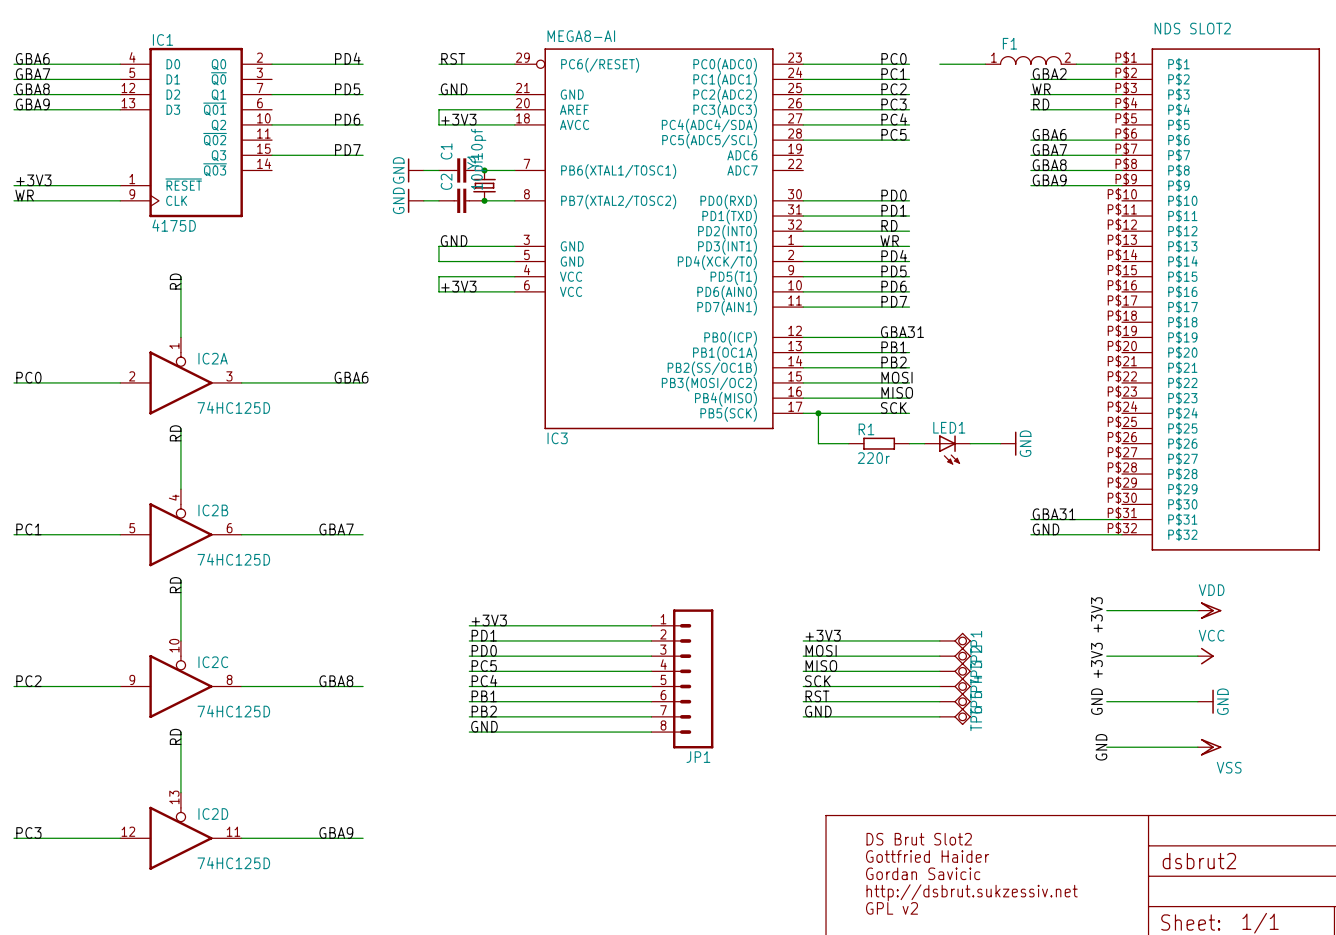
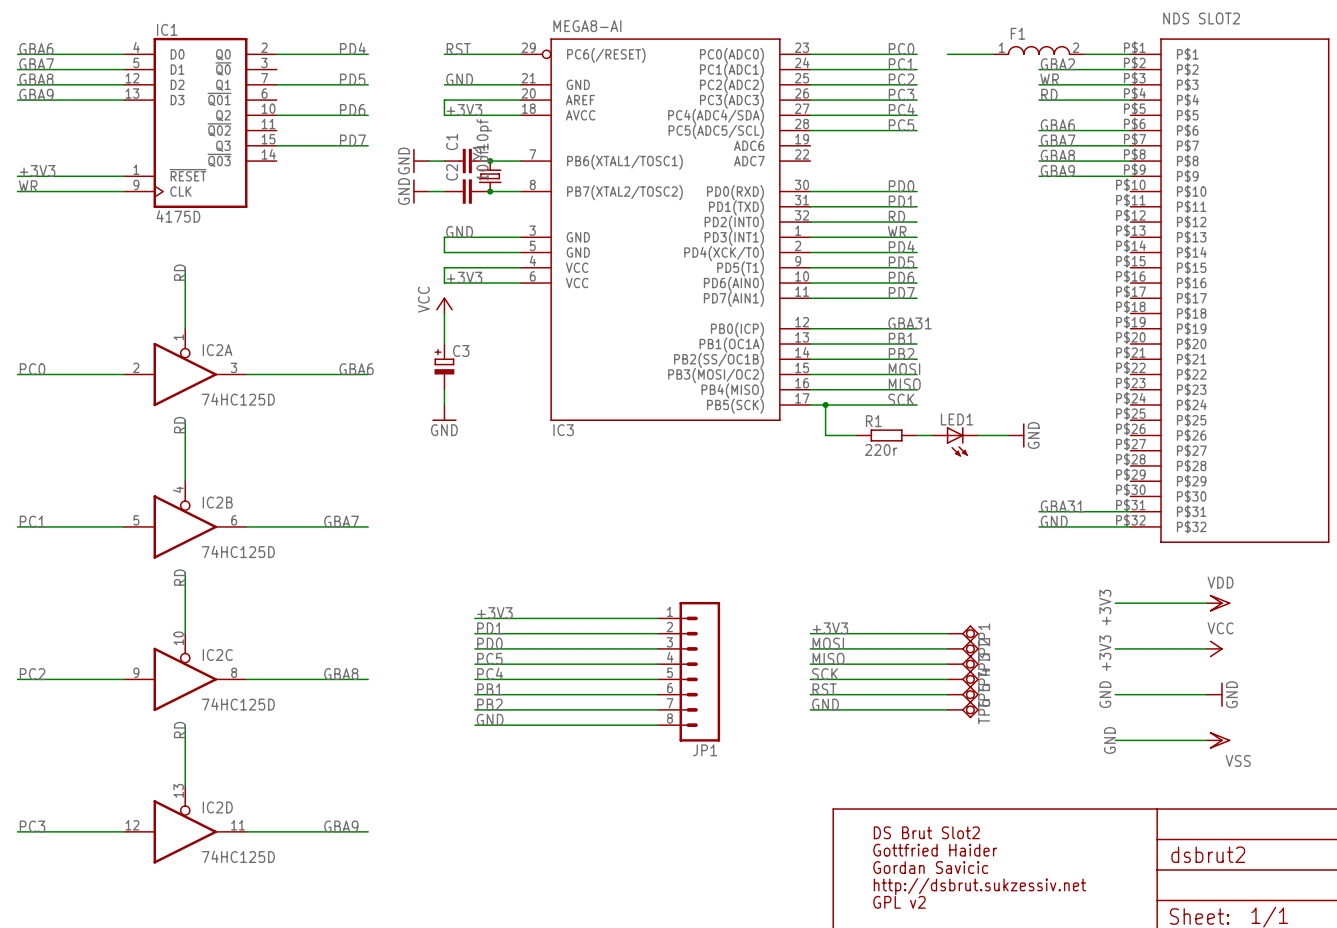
power symbol: none -> VCC (444, 305)
wire: none -> (444, 313) (444, 344)
C3: none -> (444, 366)
wire: none -> (444, 389) (444, 404)
power symbol: none -> GND (444, 412)

